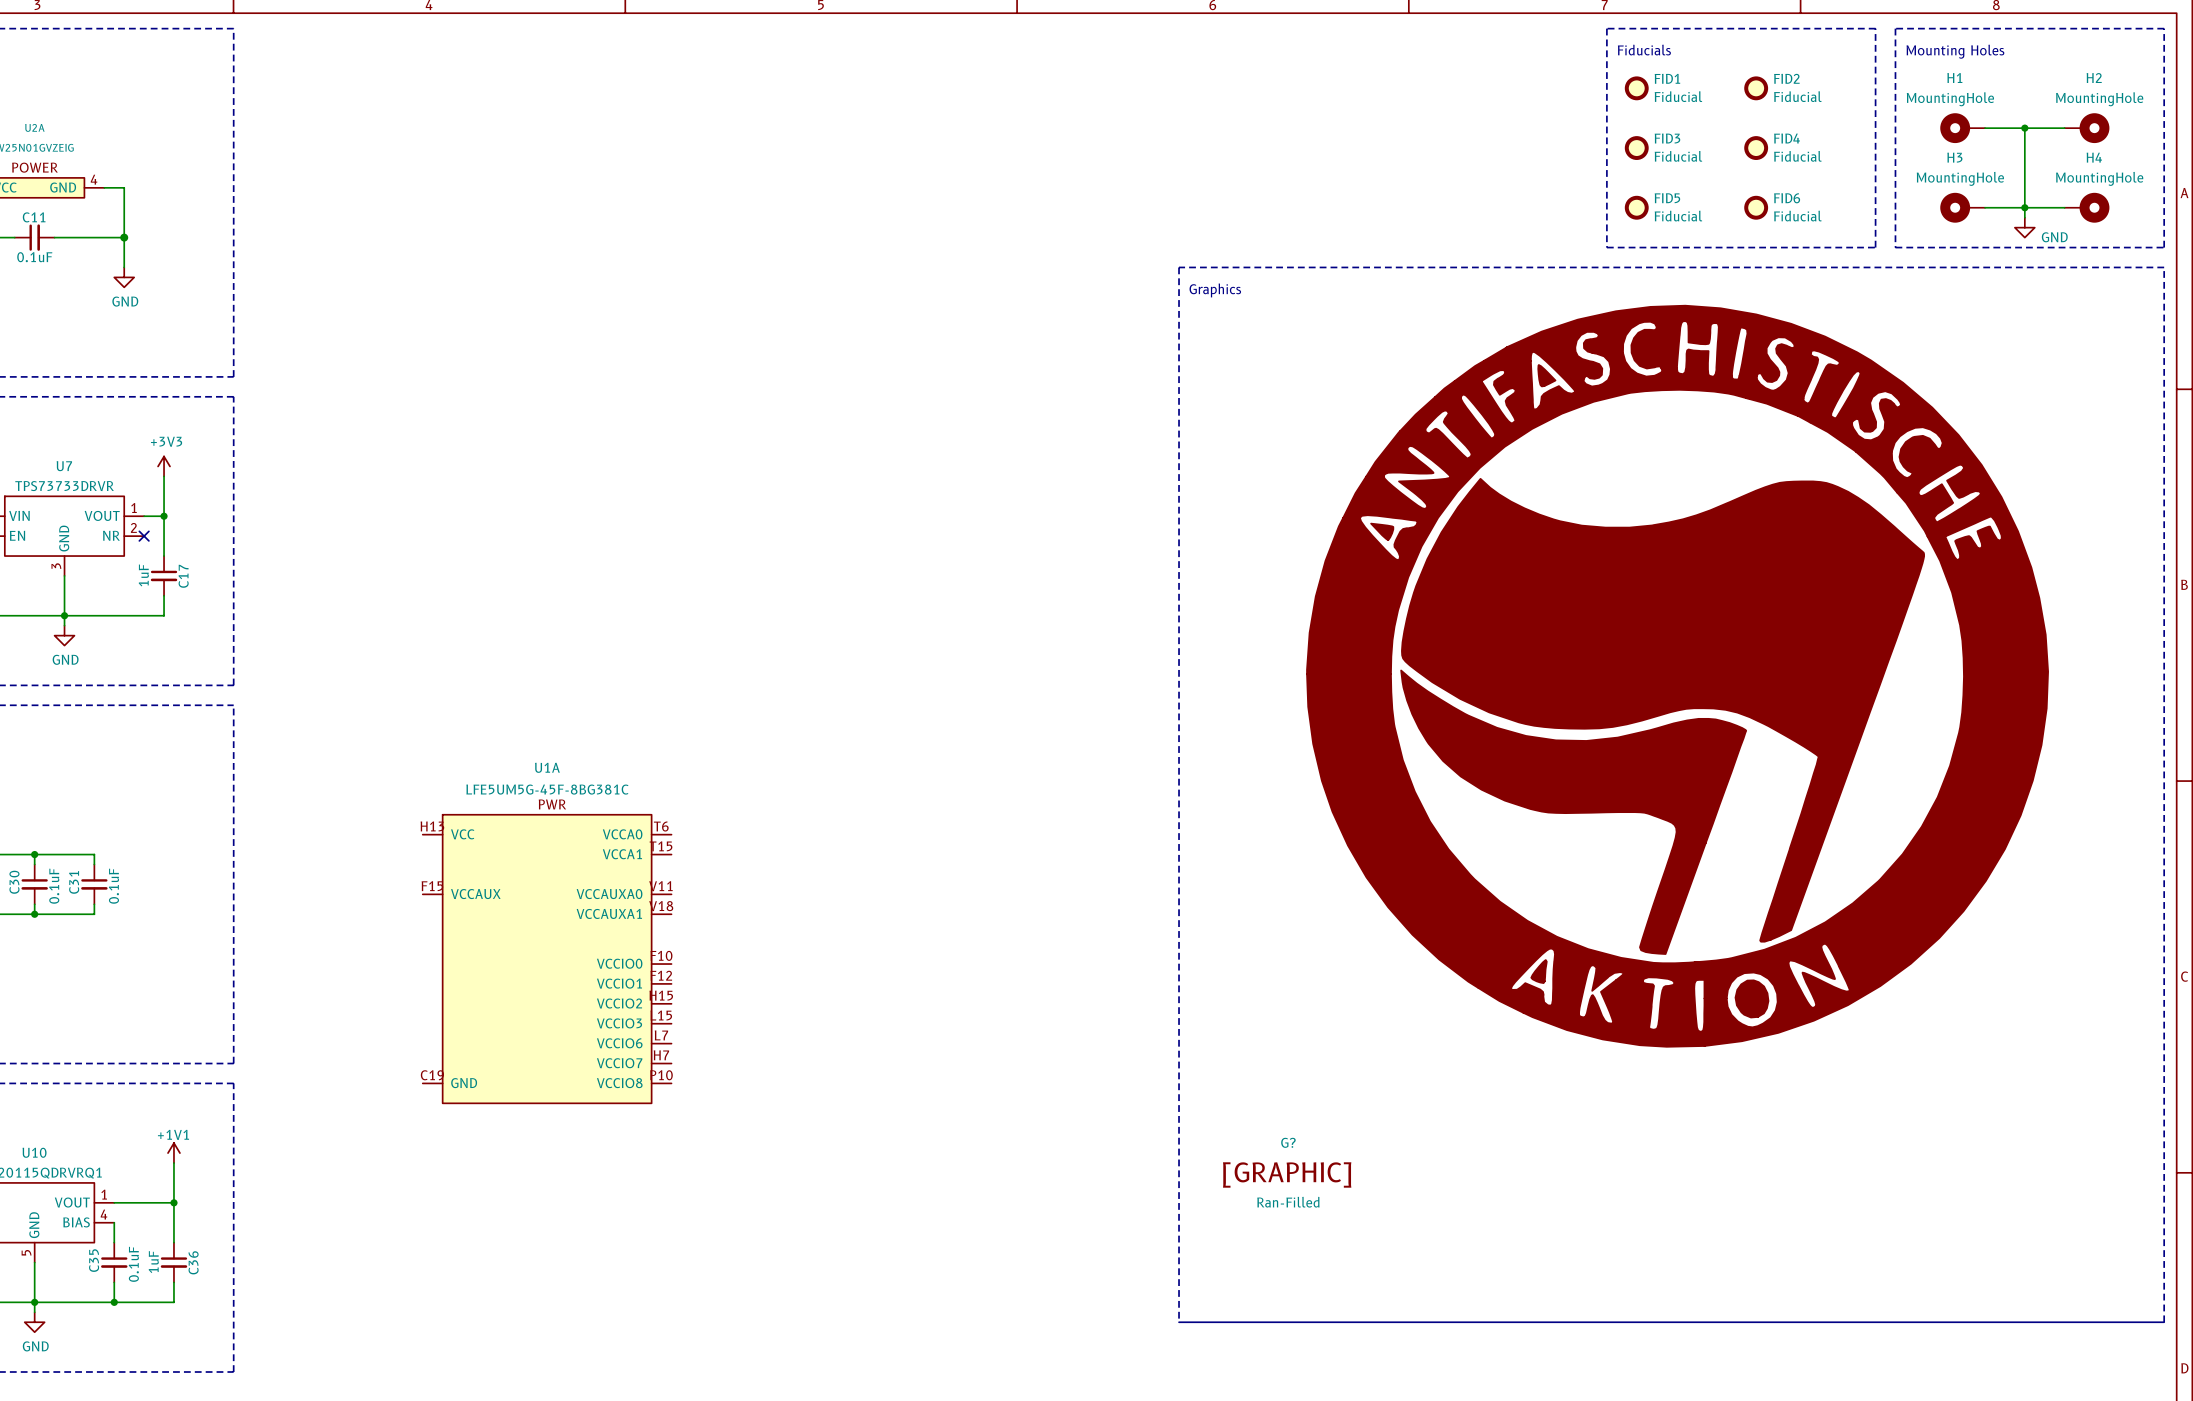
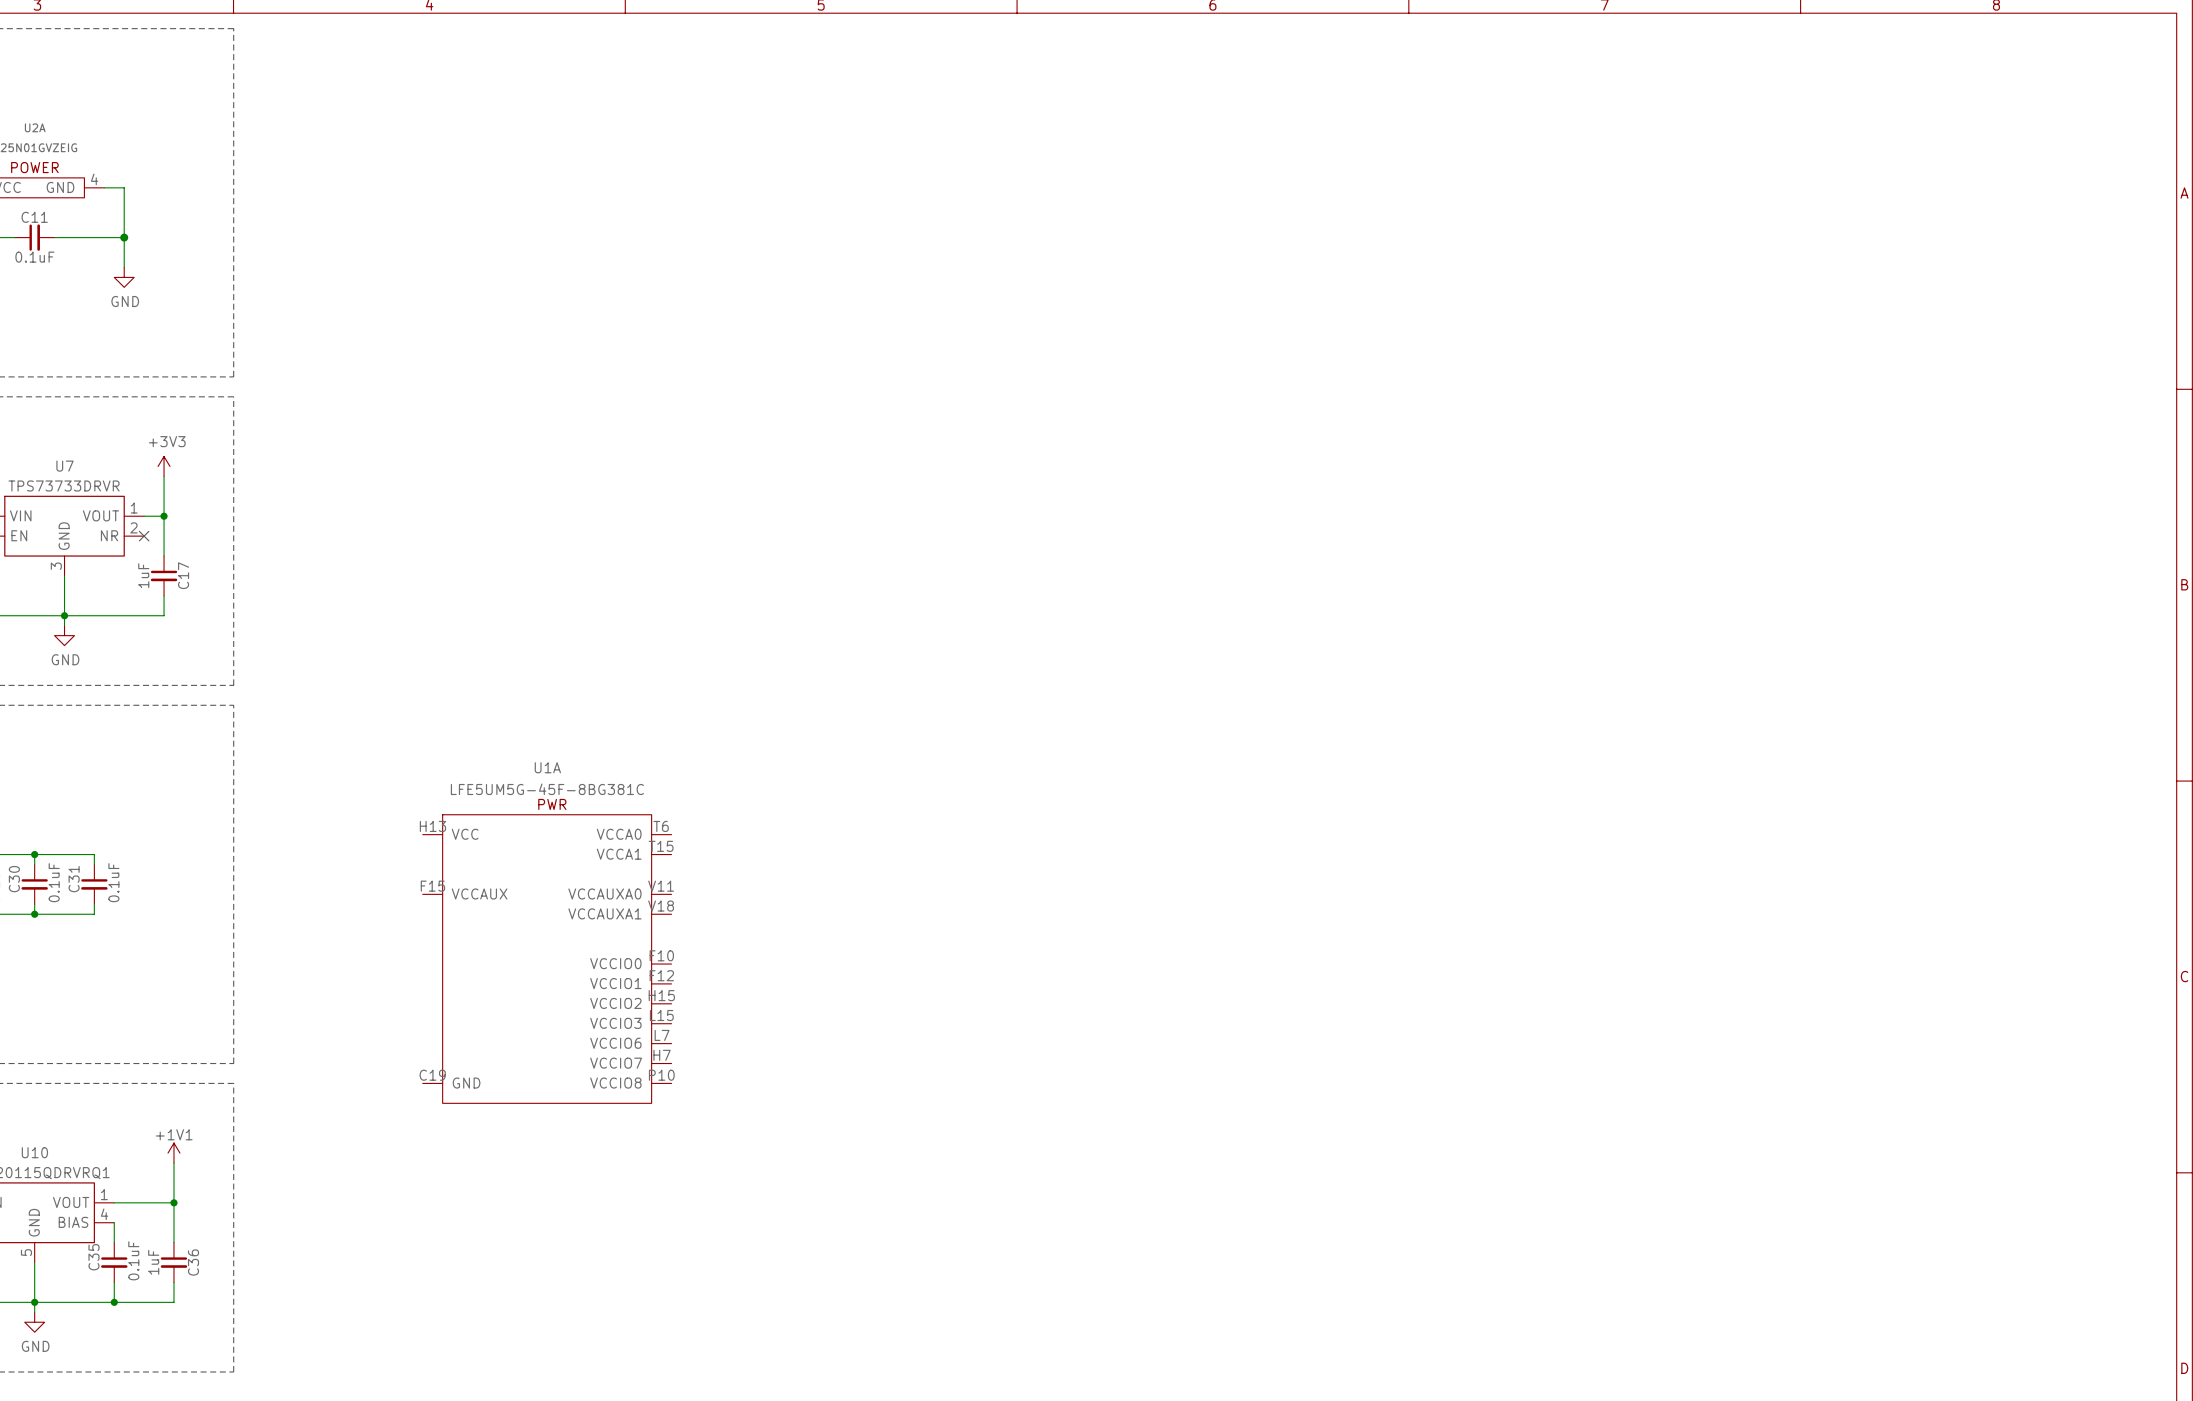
line: (1606, 28) (1875, 28) (1875, 247) (1606, 247) (1606, 28) -> none
line: (1895, 28) (2164, 28) (2164, 247) (1895, 247) (1895, 28) -> none
text: Fiducials (1644, 50) -> none
text: Mounting Holes (1955, 51) -> none
FID1: Fiducial (1636, 88) -> none
FID2: Fiducial (1756, 88) -> none
H1: MountingHole (1962, 128) -> none
wire: (1985, 128) (2064, 128) -> none
wire: (2024, 128) (2024, 217) -> none
junction: (2024, 128) -> none
H2: MountingHole (2087, 128) -> none
FID3: Fiducial (1636, 148) -> none
FID4: Fiducial (1756, 148) -> none
FID5: Fiducial (1636, 207) -> none
FID6: Fiducial (1756, 207) -> none
H3: MountingHole (1962, 207) -> none
wire: (1985, 207) (2064, 207) -> none
junction: (2024, 207) -> none
H4: MountingHole (2087, 207) -> none
power symbol: GND (2024, 227) -> none
line: (1179, 267) (2164, 267) (2164, 1322) (1179, 1322) (1179, 267) -> none
text: Graphics (1215, 290) -> none
part: (1677, 676) -> none
G?: Ran-Filled (1287, 1172) -> none

